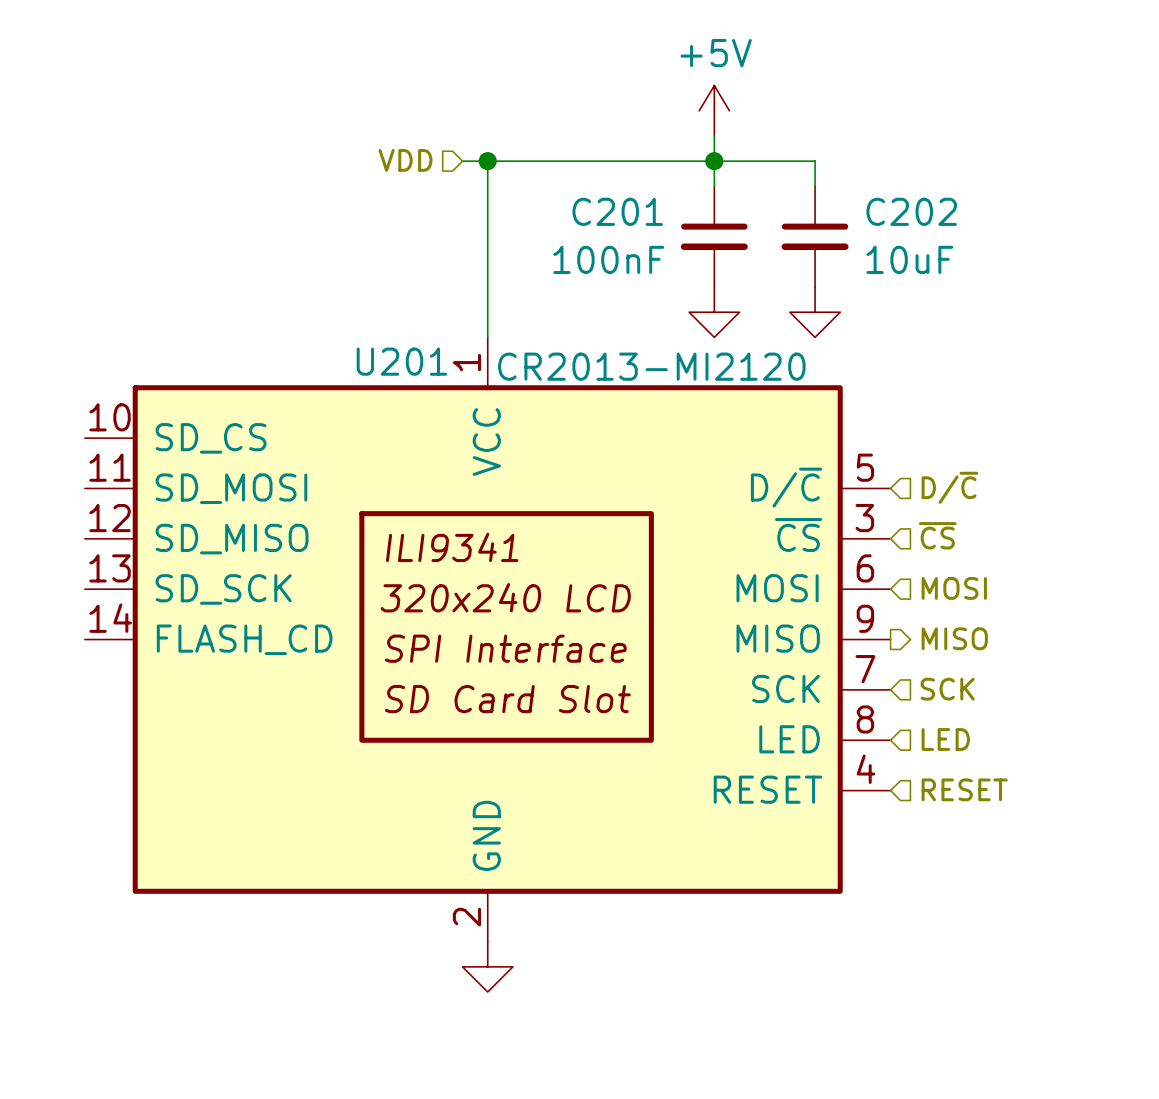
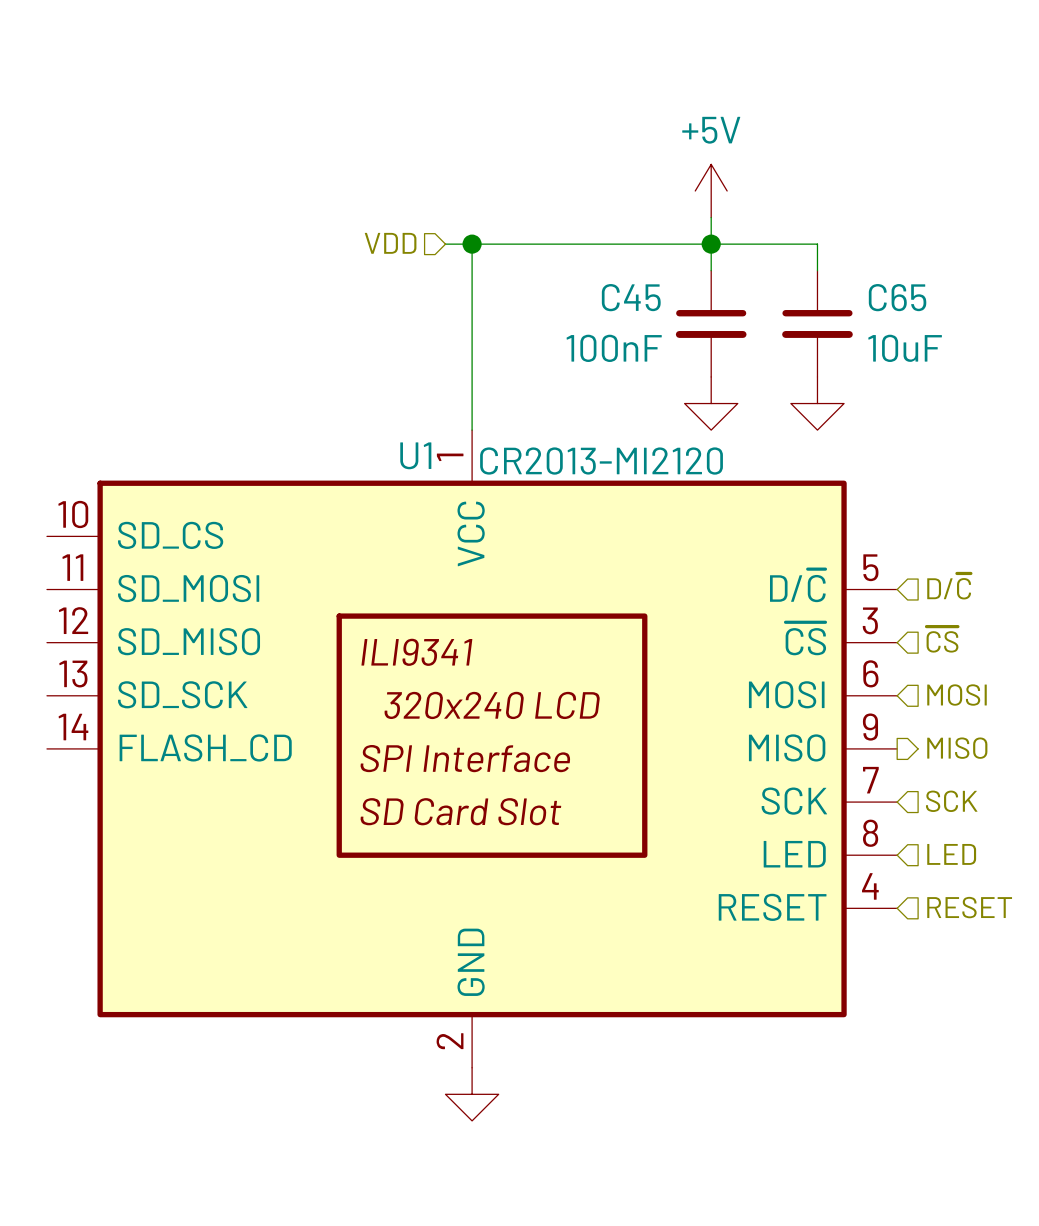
C201 name: C201 (617, 211) -> C45 (631, 297)
C202 name: C202 (911, 211) -> C65 (897, 297)
U201 name: U201 (401, 361) -> U1 (415, 455)

